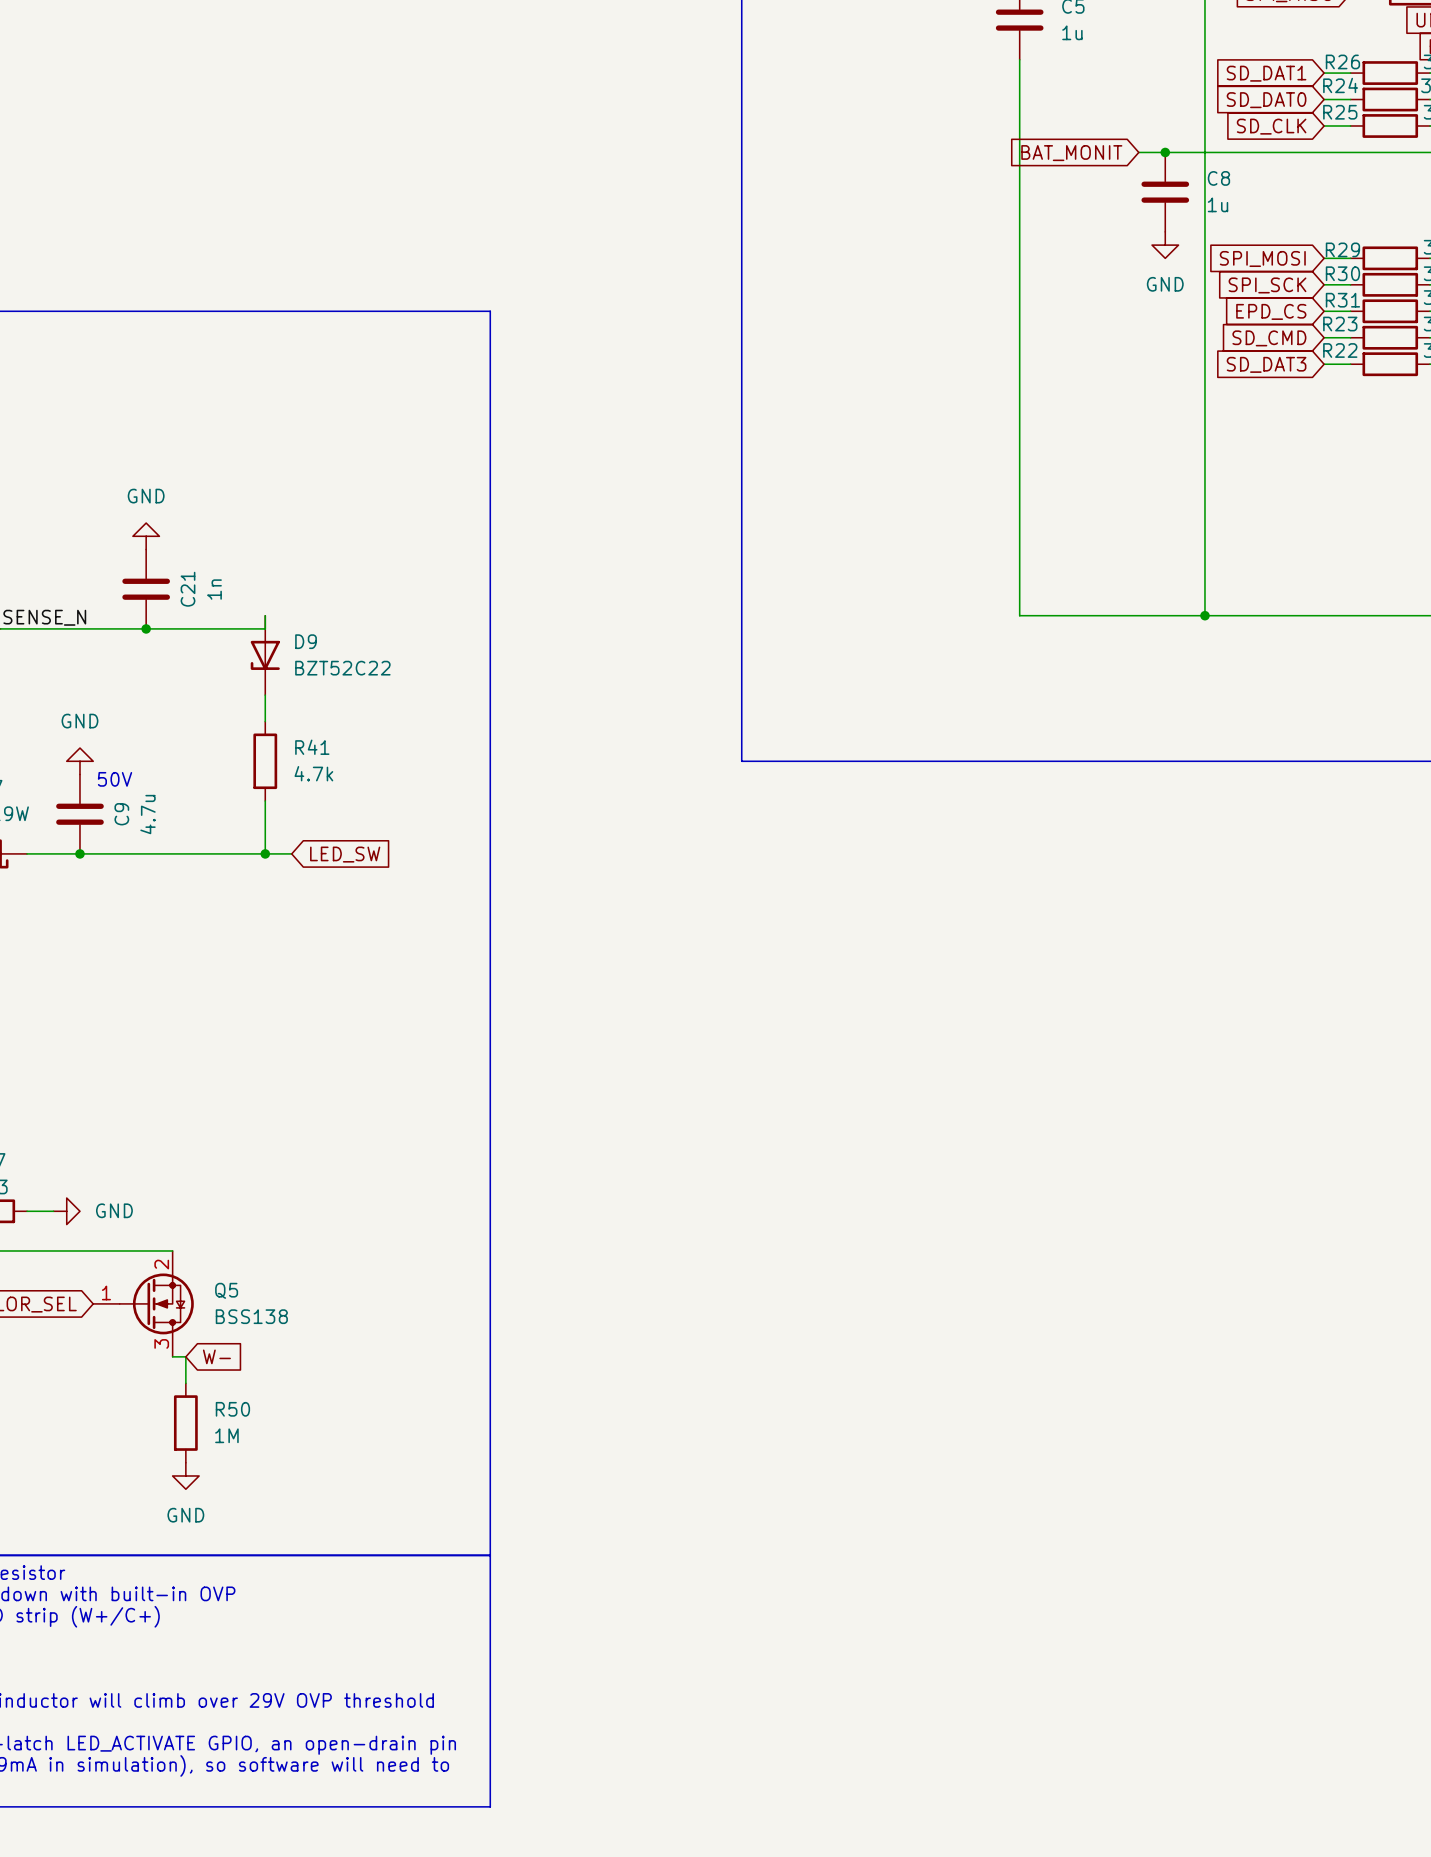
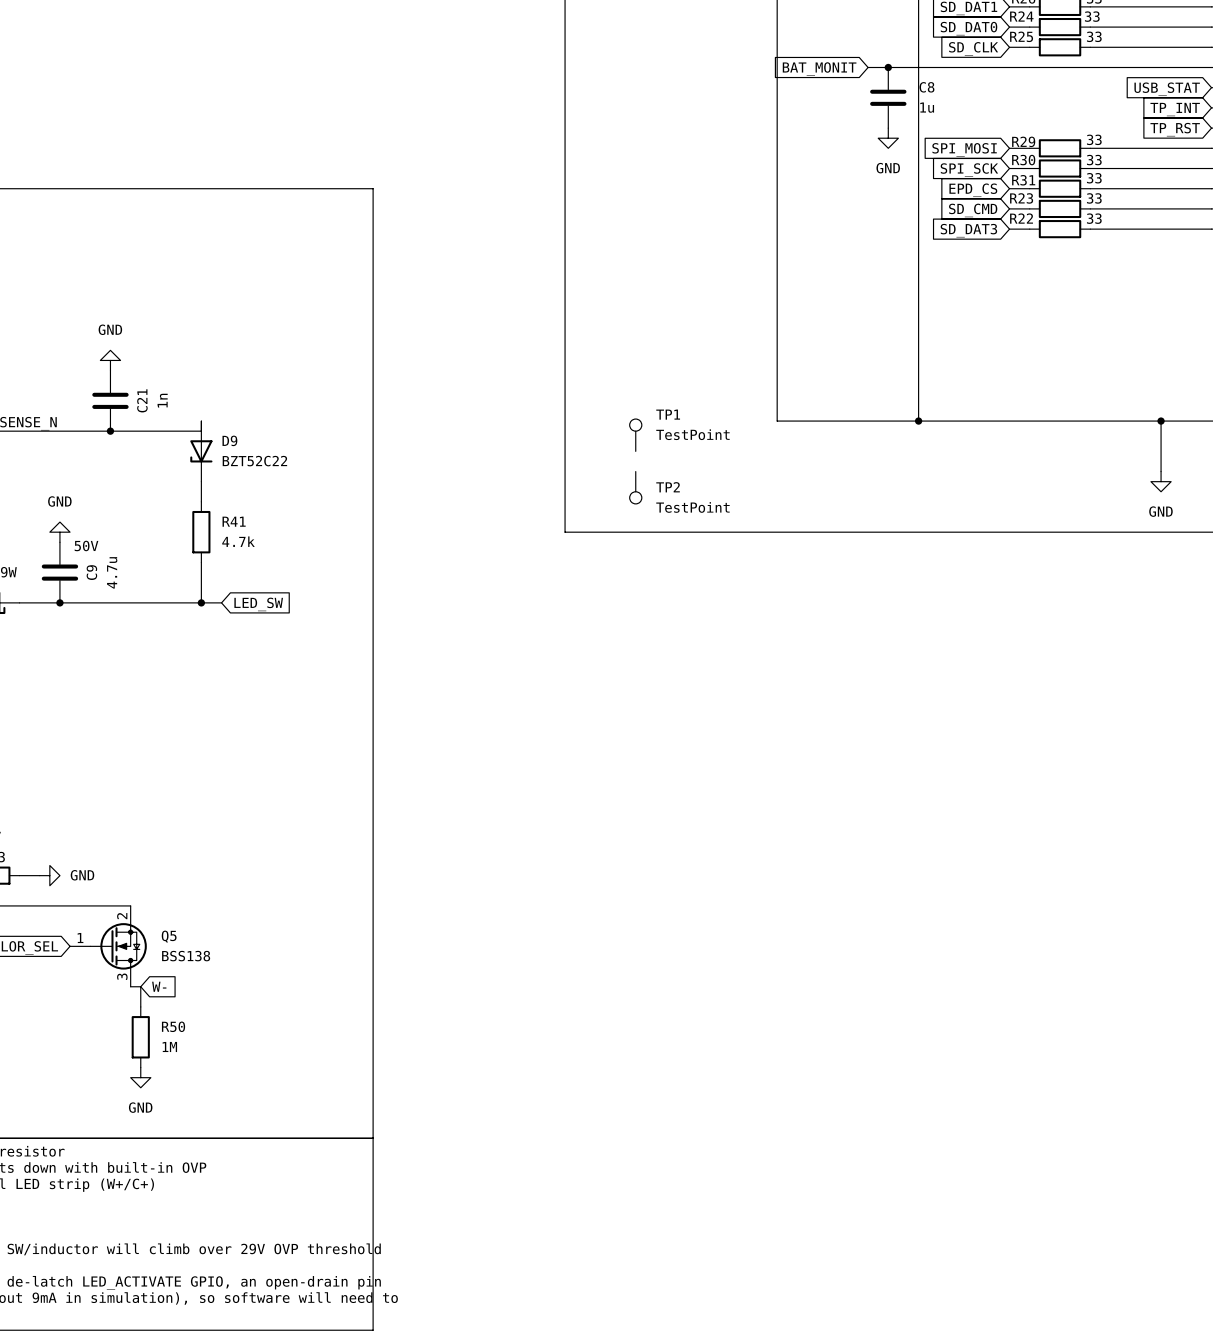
TP1: none -> TestPoint (635, 435)
TP2: none -> TestPoint (635, 487)

